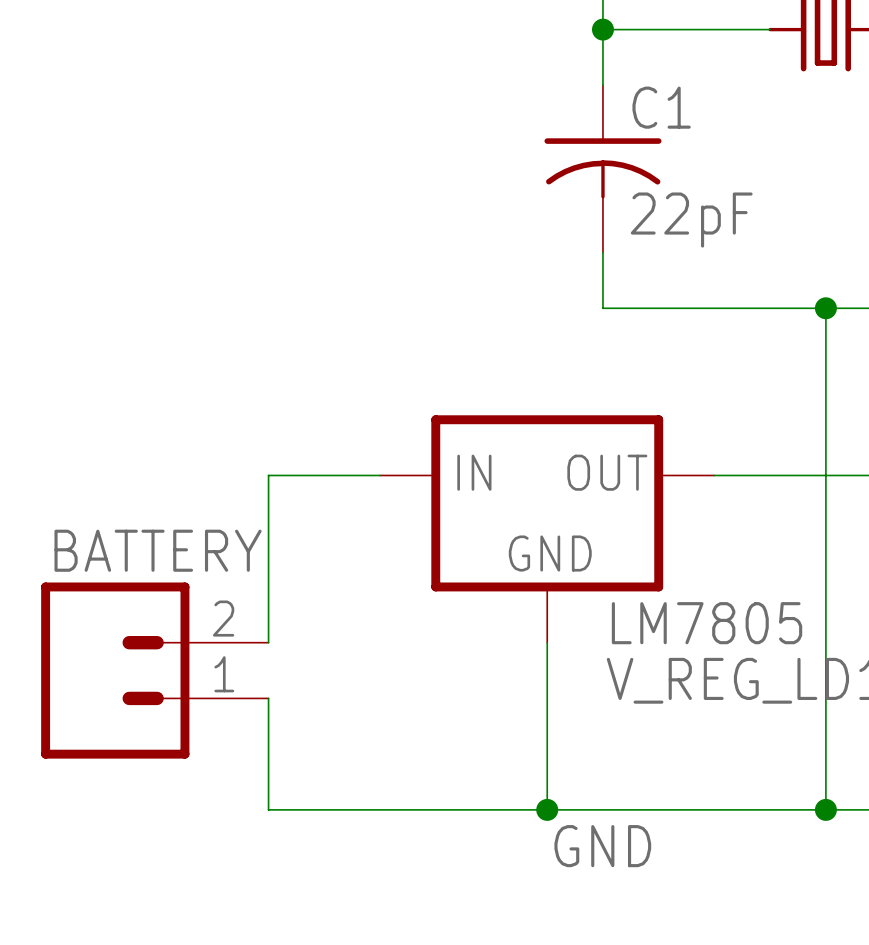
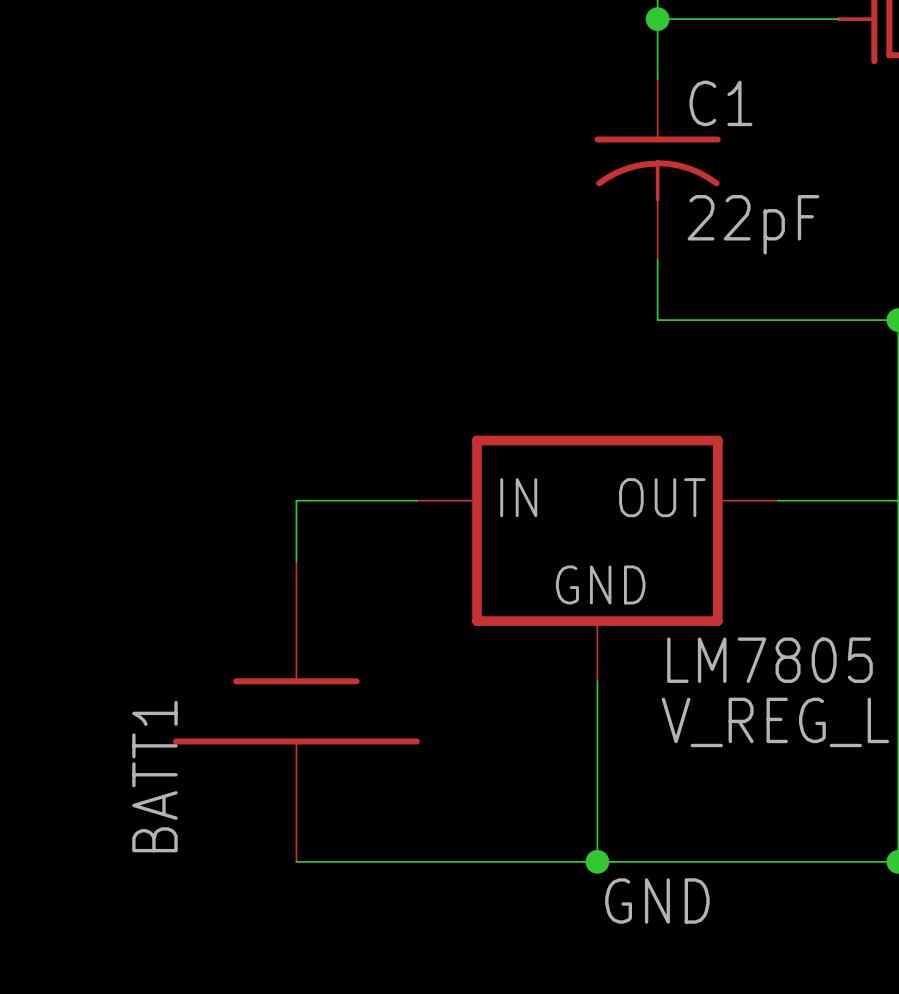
BATTERY: (154, 670) -> none
BATT1: none -> (296, 711)

